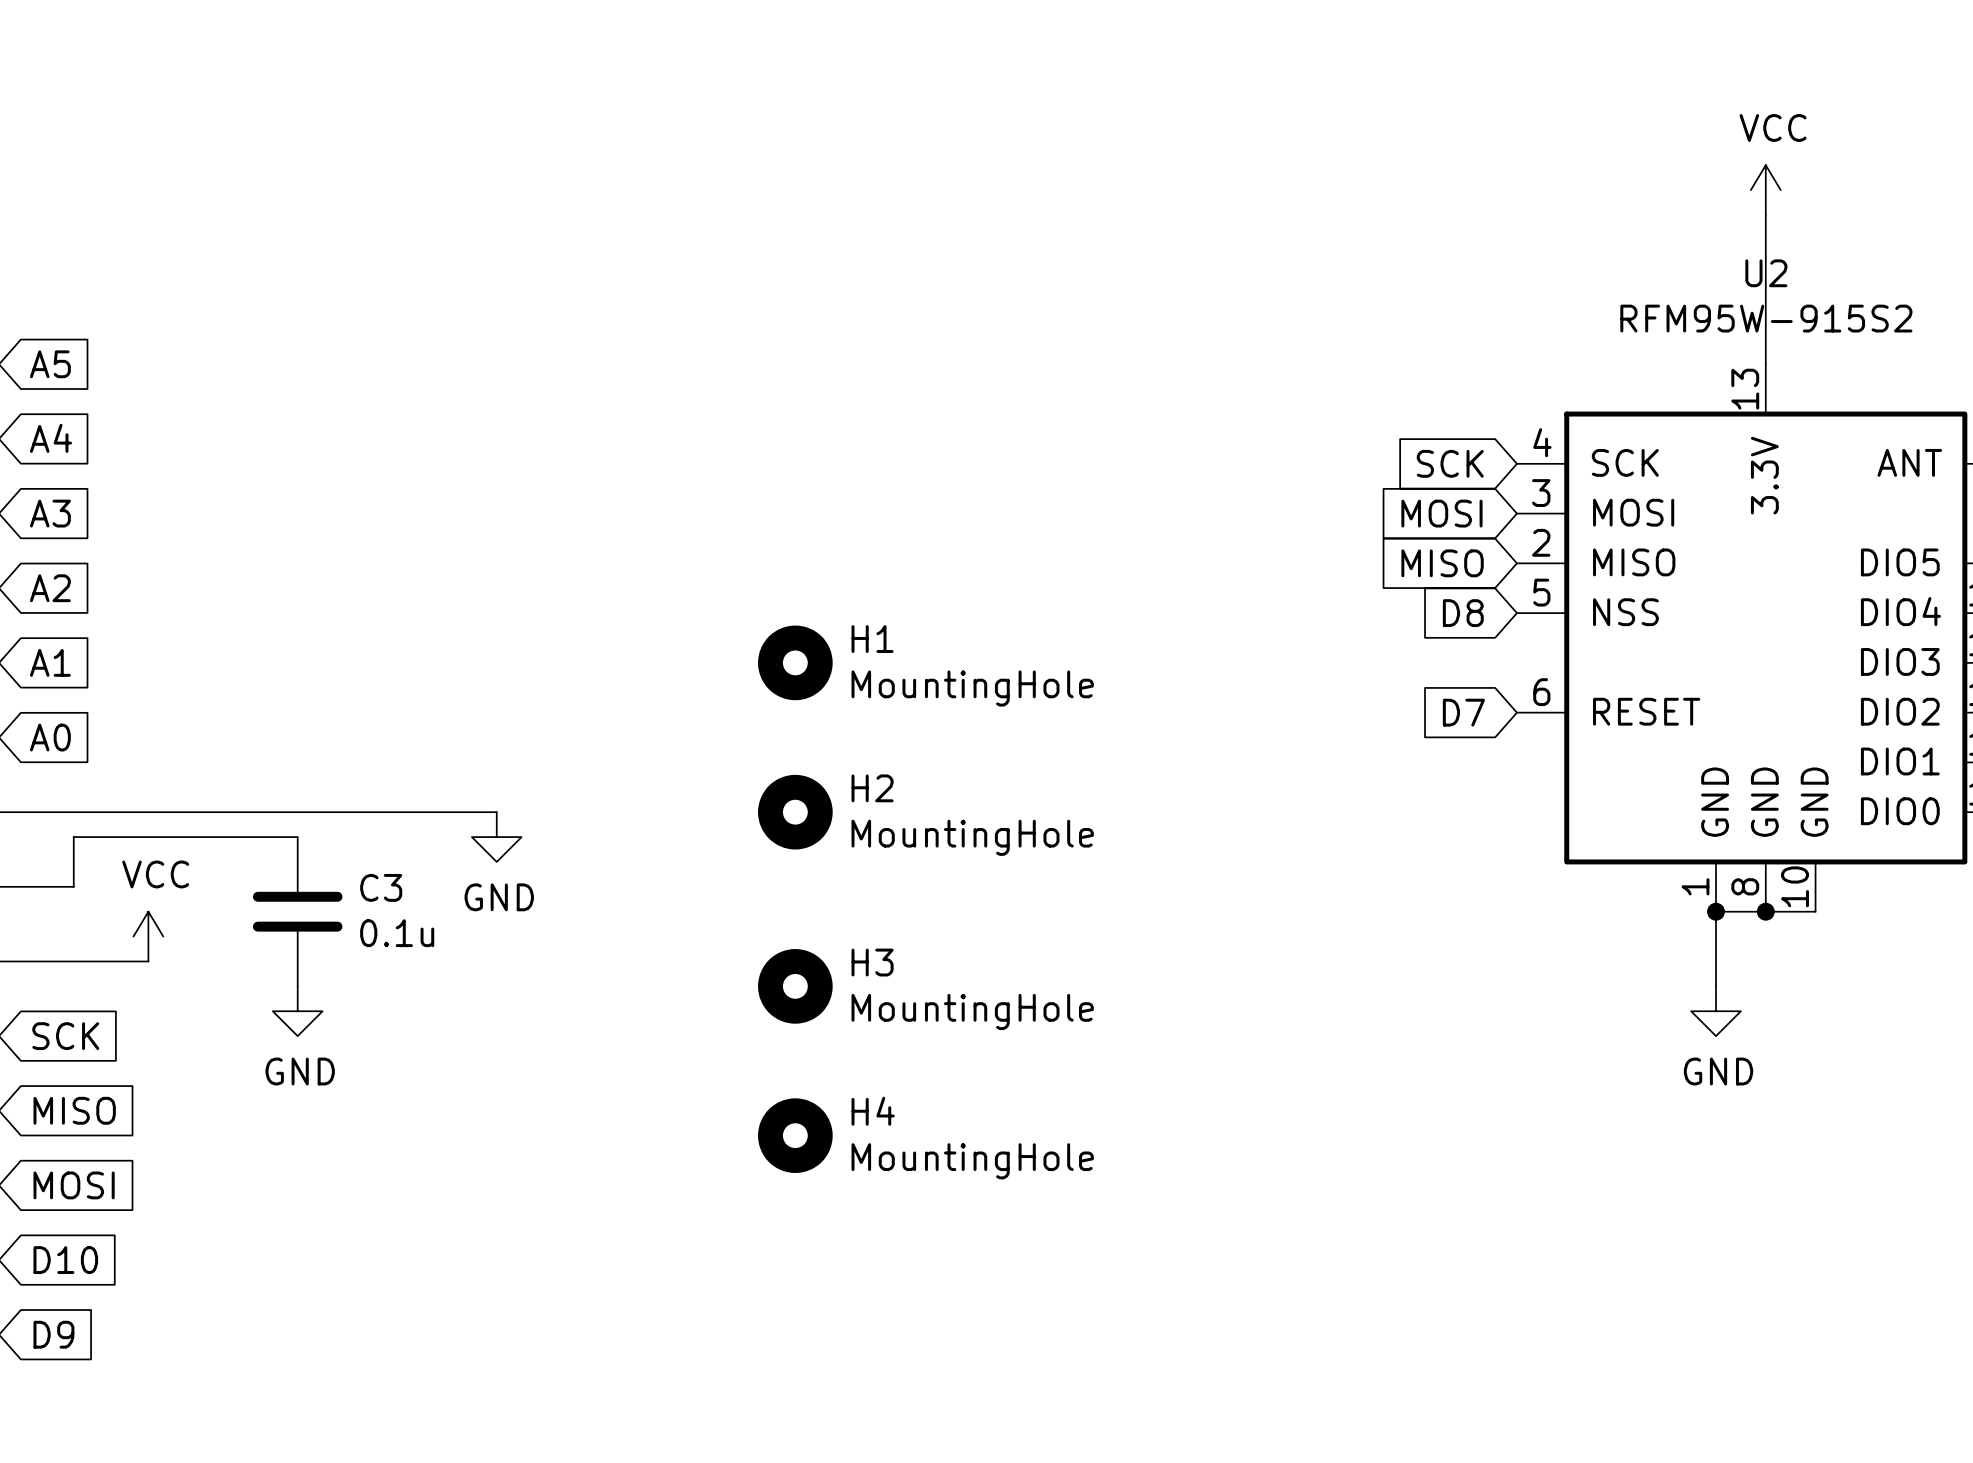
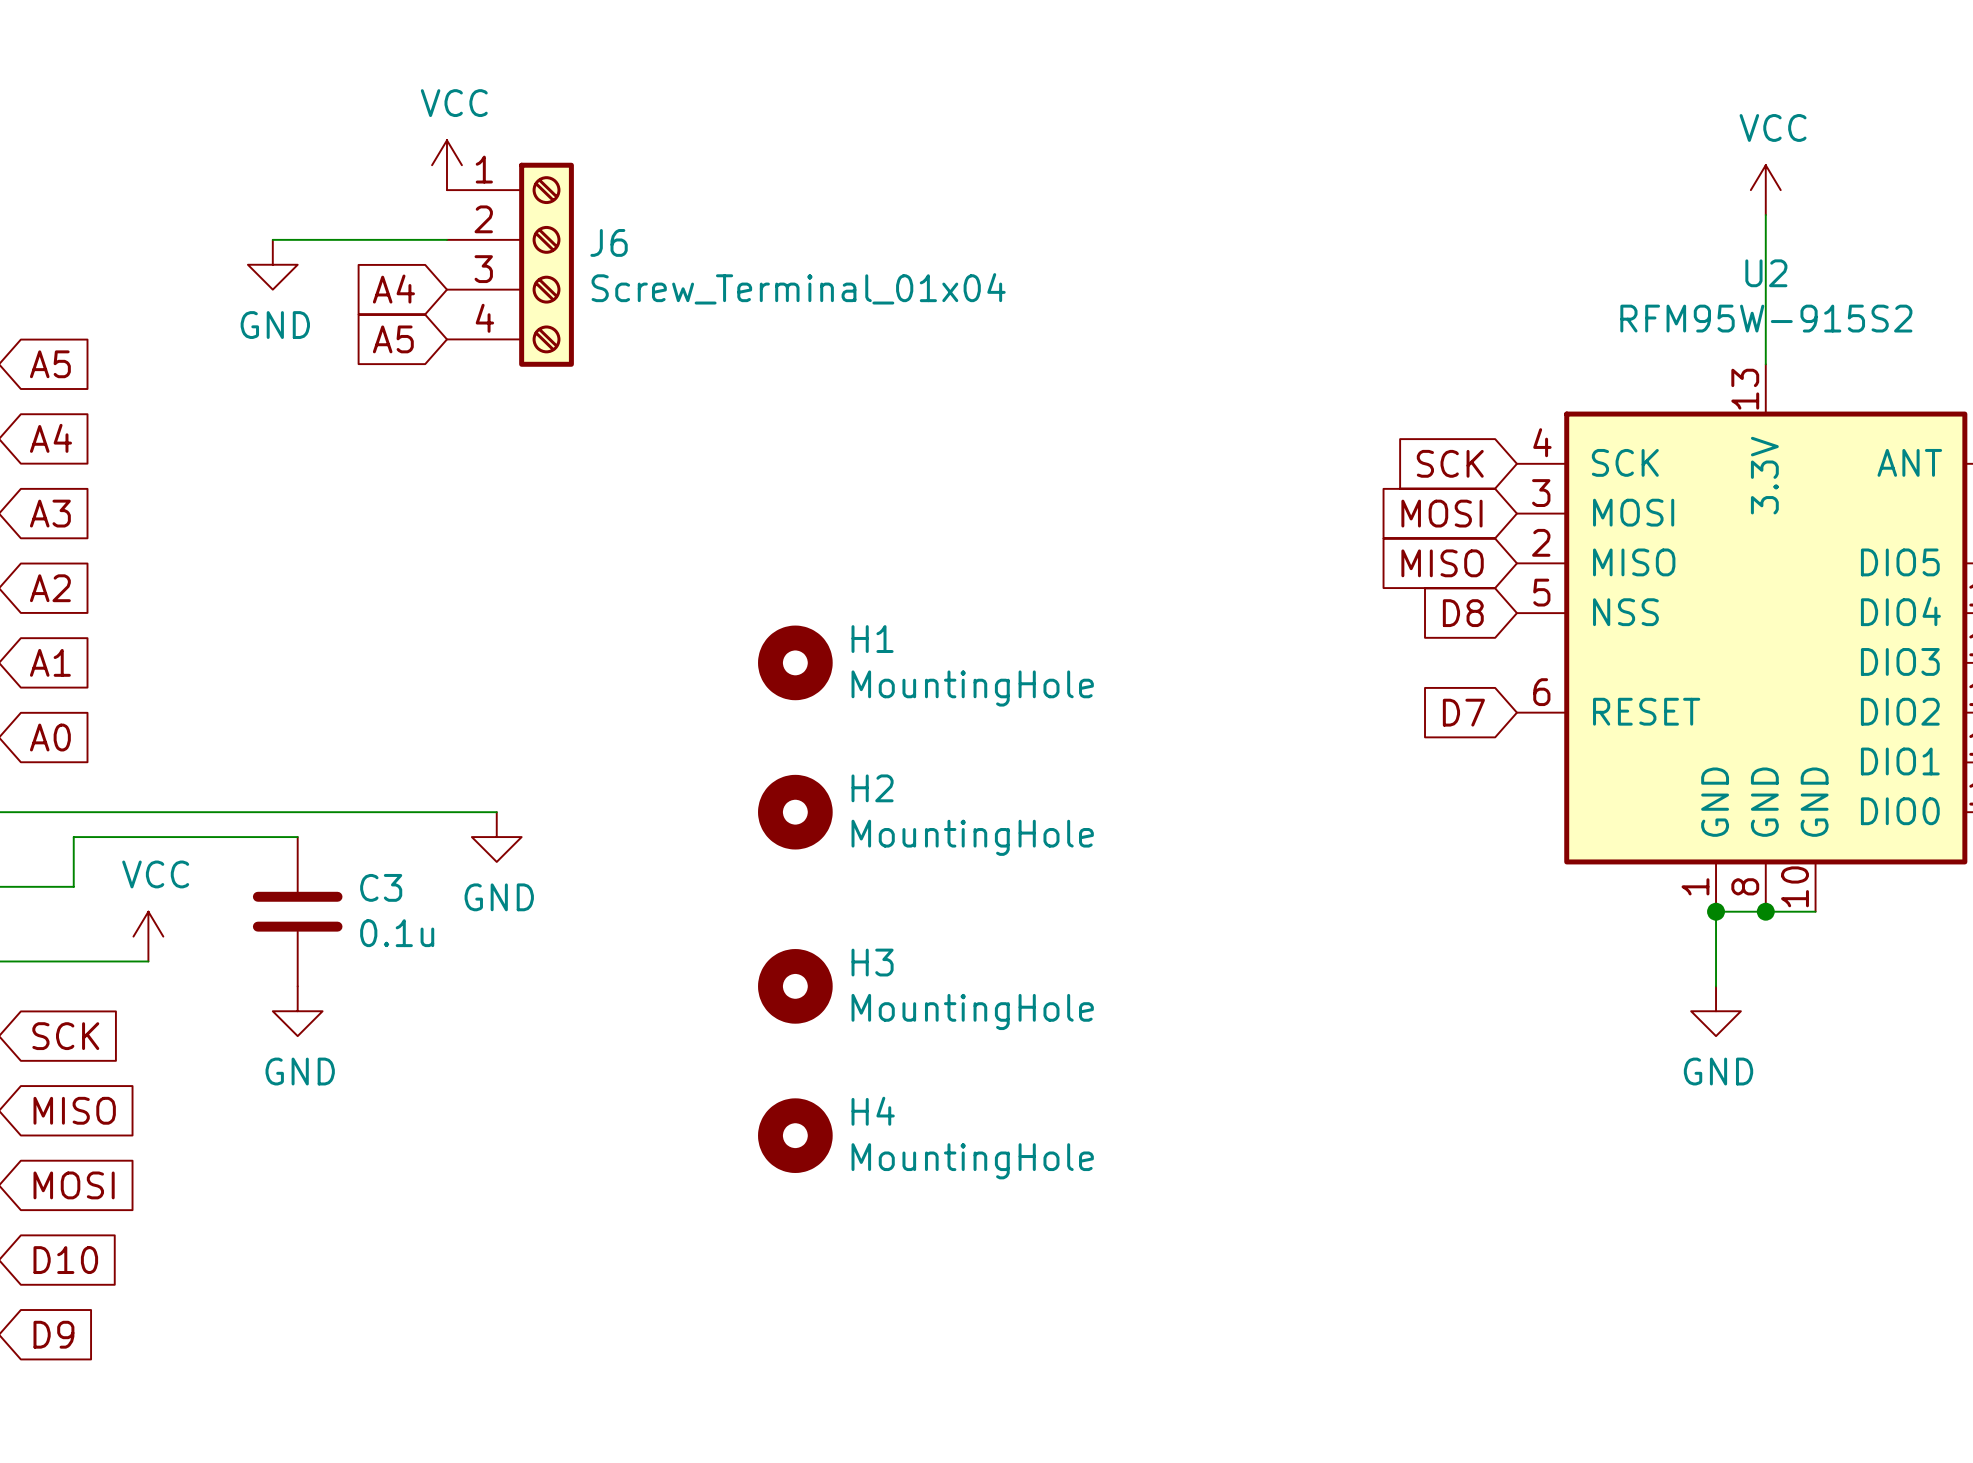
power symbol: none -> VCC (446, 165)
wire: none -> (272, 239) (446, 239)
power symbol: none -> GND (272, 264)
J6: none -> Screw_Terminal_01x04 (510, 264)
global label: none -> A4 (393, 289)
global label: none -> A5 (393, 339)

